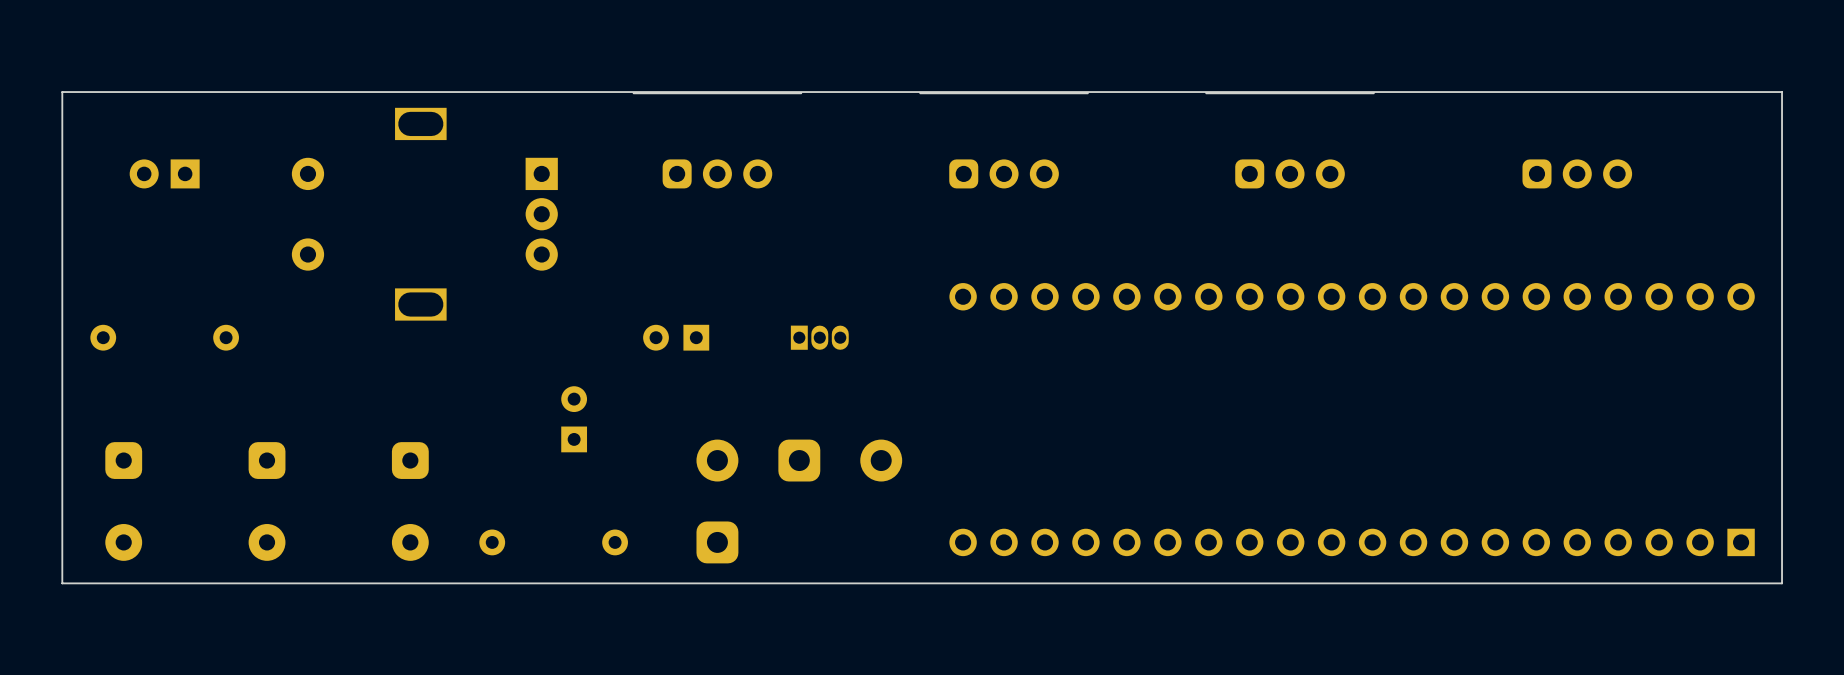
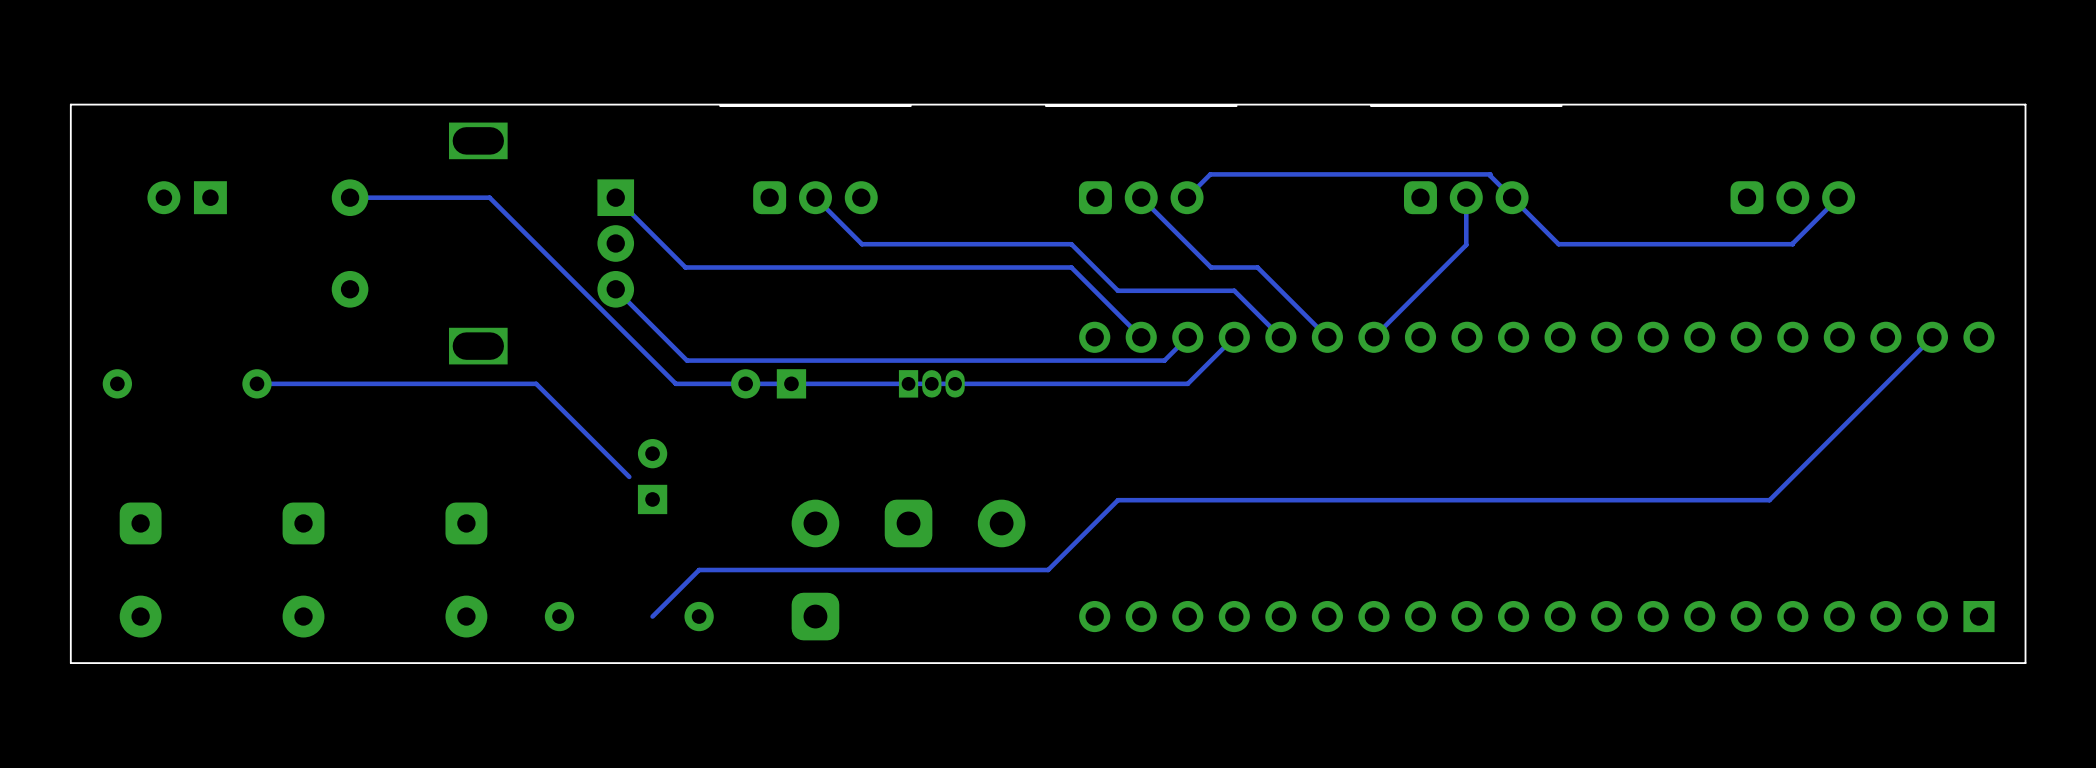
track: none -> (350, 197) (489, 197) (675, 383) (1187, 383) (1234, 337)
track: none -> (615, 197) (685, 267) (1071, 267) (1141, 337)
track: none -> (815, 197) (862, 244) (1071, 244) (1117, 290) (1234, 290) (1280, 337)
track: none -> (1141, 197) (1211, 267) (1257, 267) (1327, 337)
track: none -> (1466, 197) (1466, 244) (1373, 337)
track: none -> (1838, 197) (1792, 244) (1558, 244) (1490, 174) (1210, 174) (1187, 197)
track: none -> (615, 289) (687, 360) (1164, 360) (1187, 337)
track: none -> (1932, 337) (1769, 500) (1117, 500) (1048, 570) (699, 570) (652, 616)
track: none -> (256, 383) (536, 383) (629, 476)

